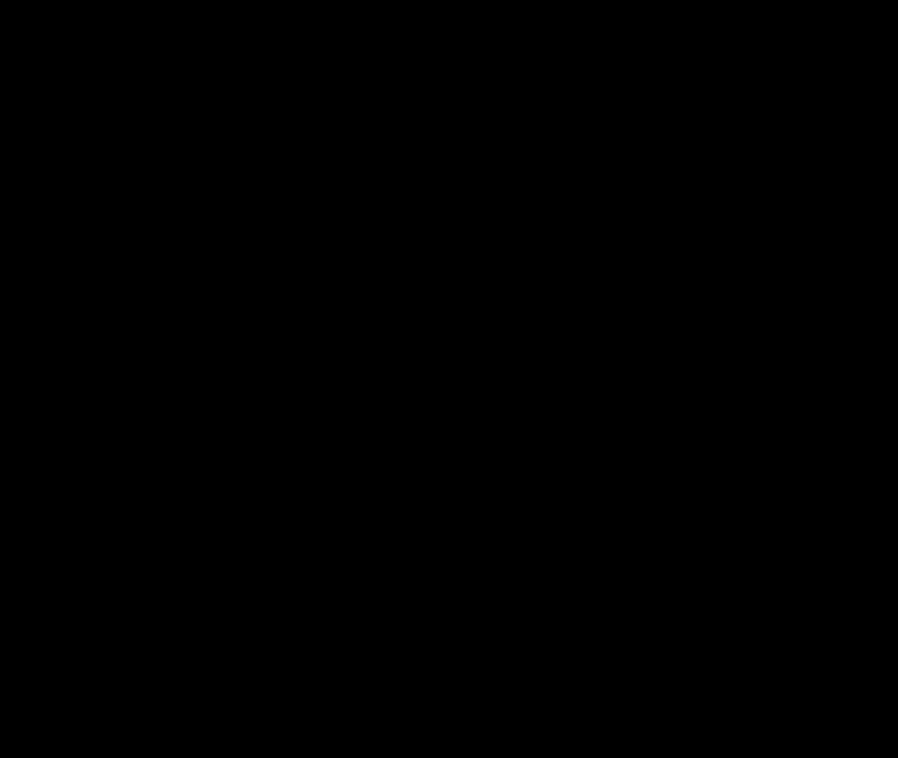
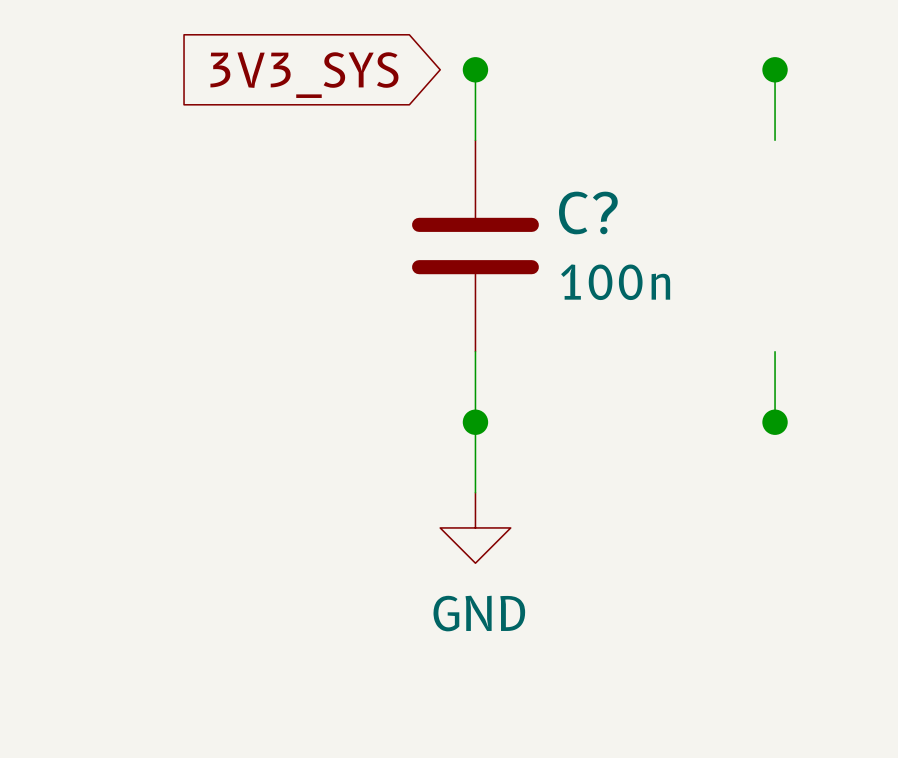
wire: none -> (475, 69) (475, 140)
junction: none -> (475, 69)
wire: none -> (775, 69) (775, 140)
junction: none -> (775, 69)
global label: none -> 3V3_SYS (304, 75)
C?: none -> (475, 246)
wire: none -> (475, 351) (475, 492)
wire: none -> (775, 351) (775, 422)
junction: none -> (475, 422)
junction: none -> (775, 422)
power symbol: none -> GND (475, 527)

